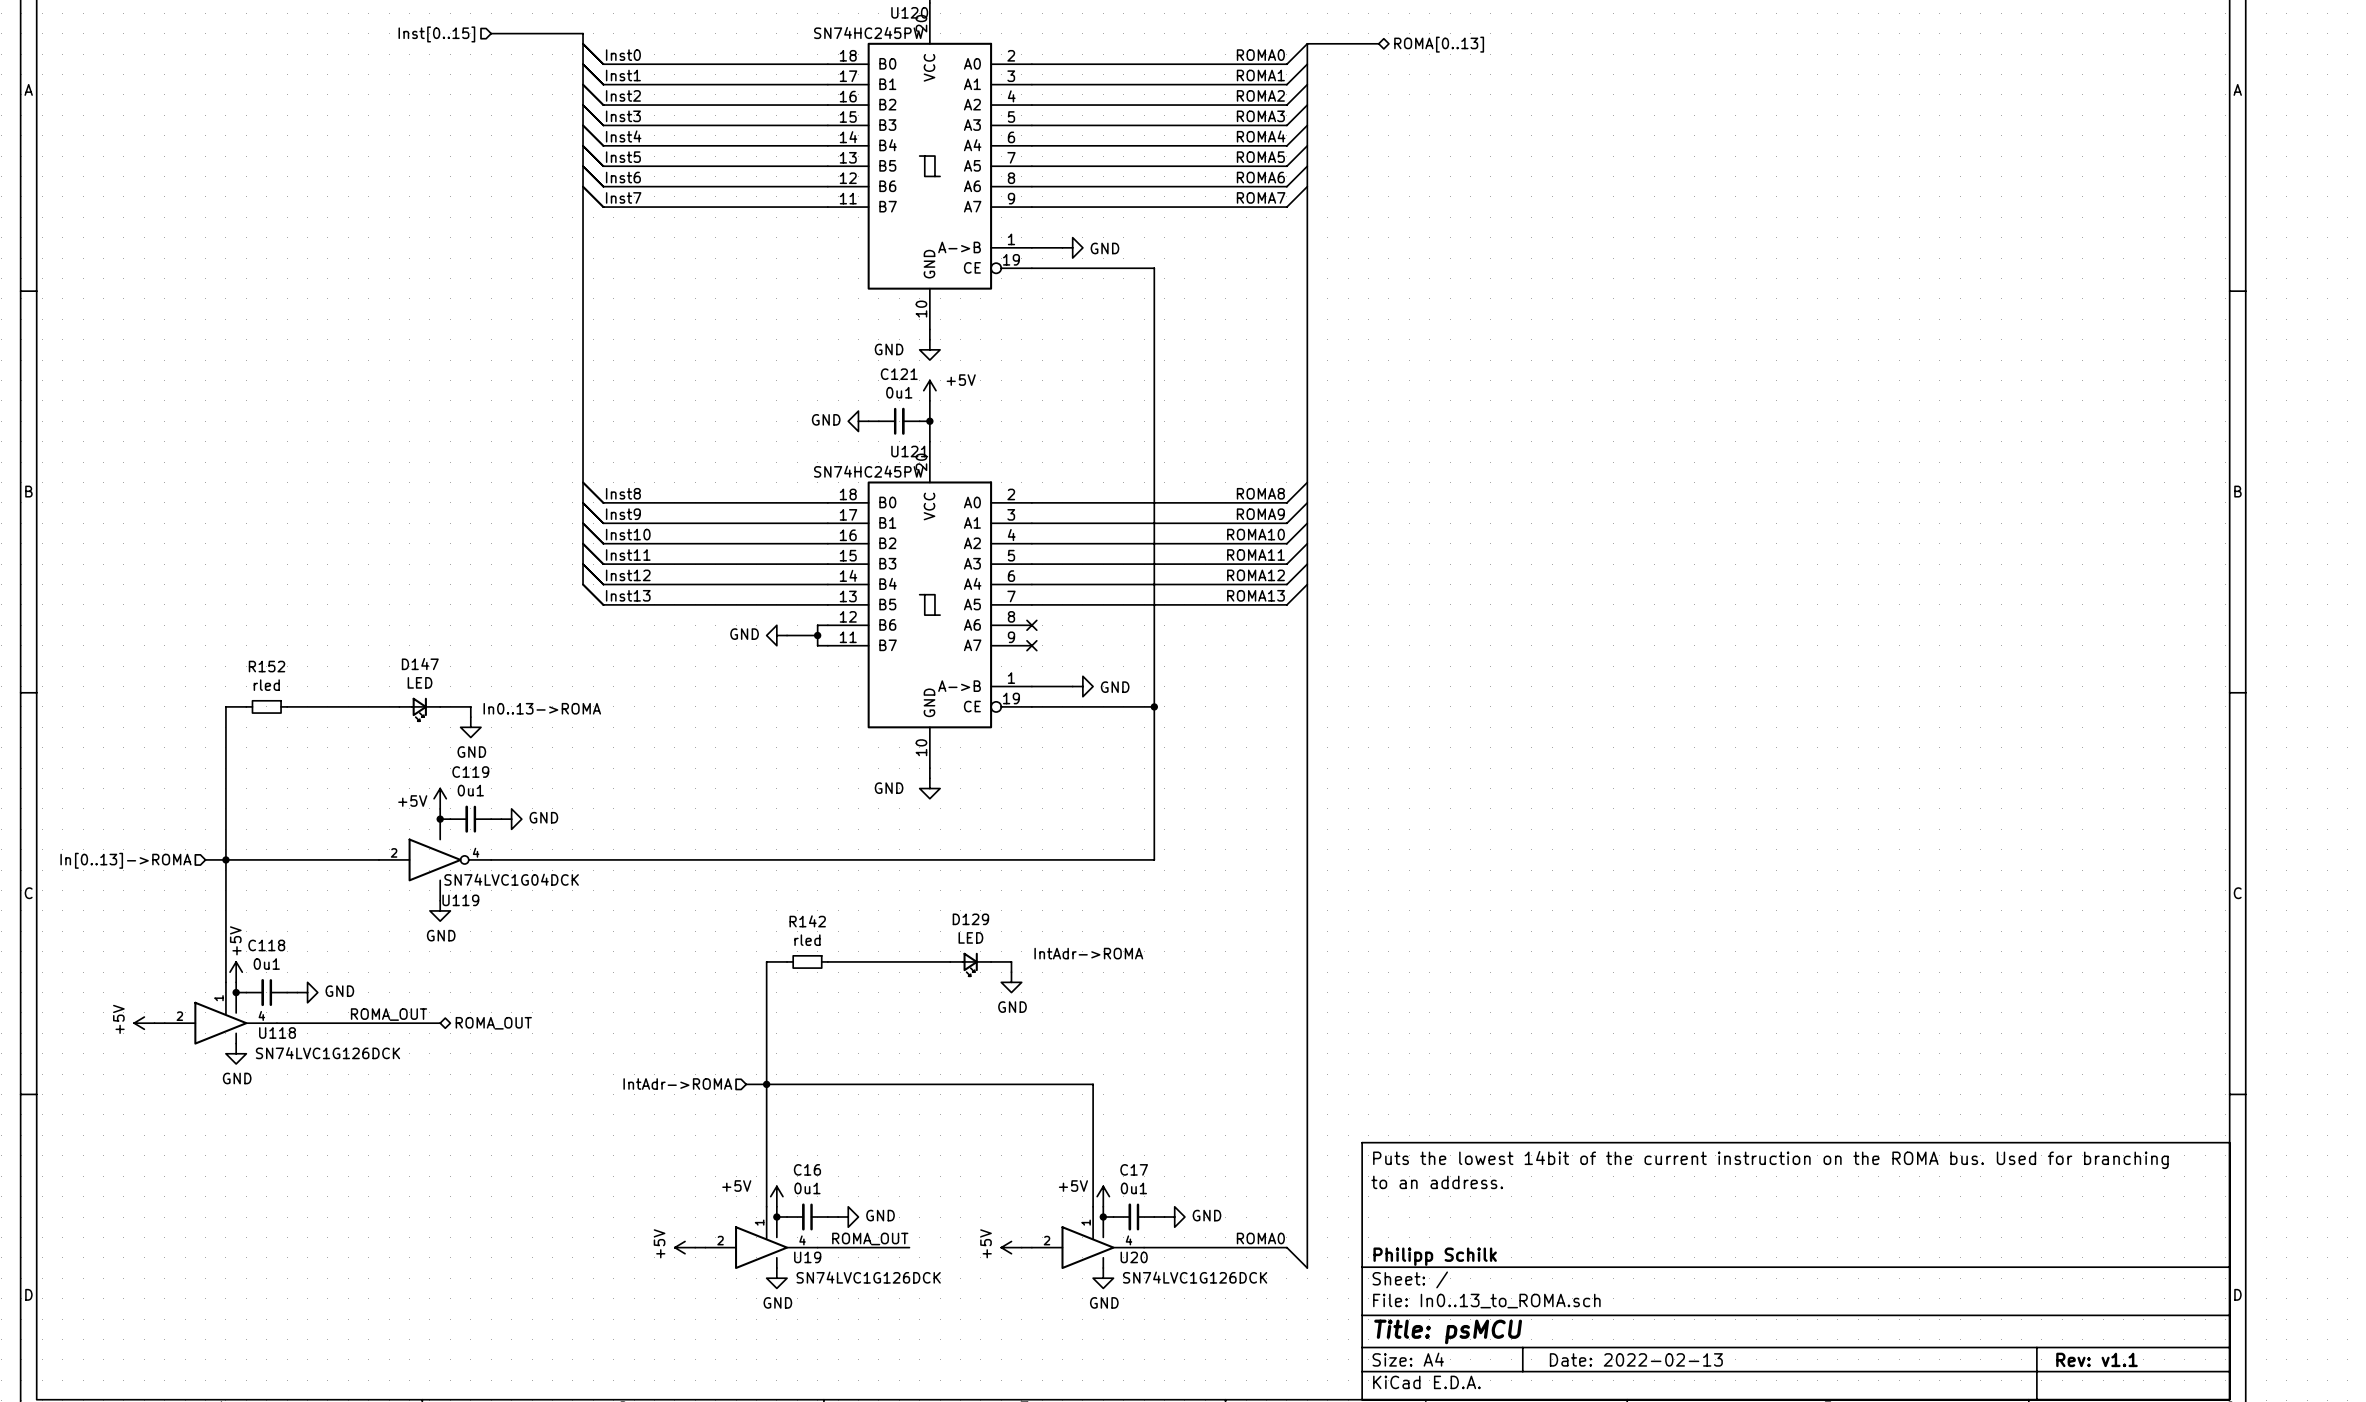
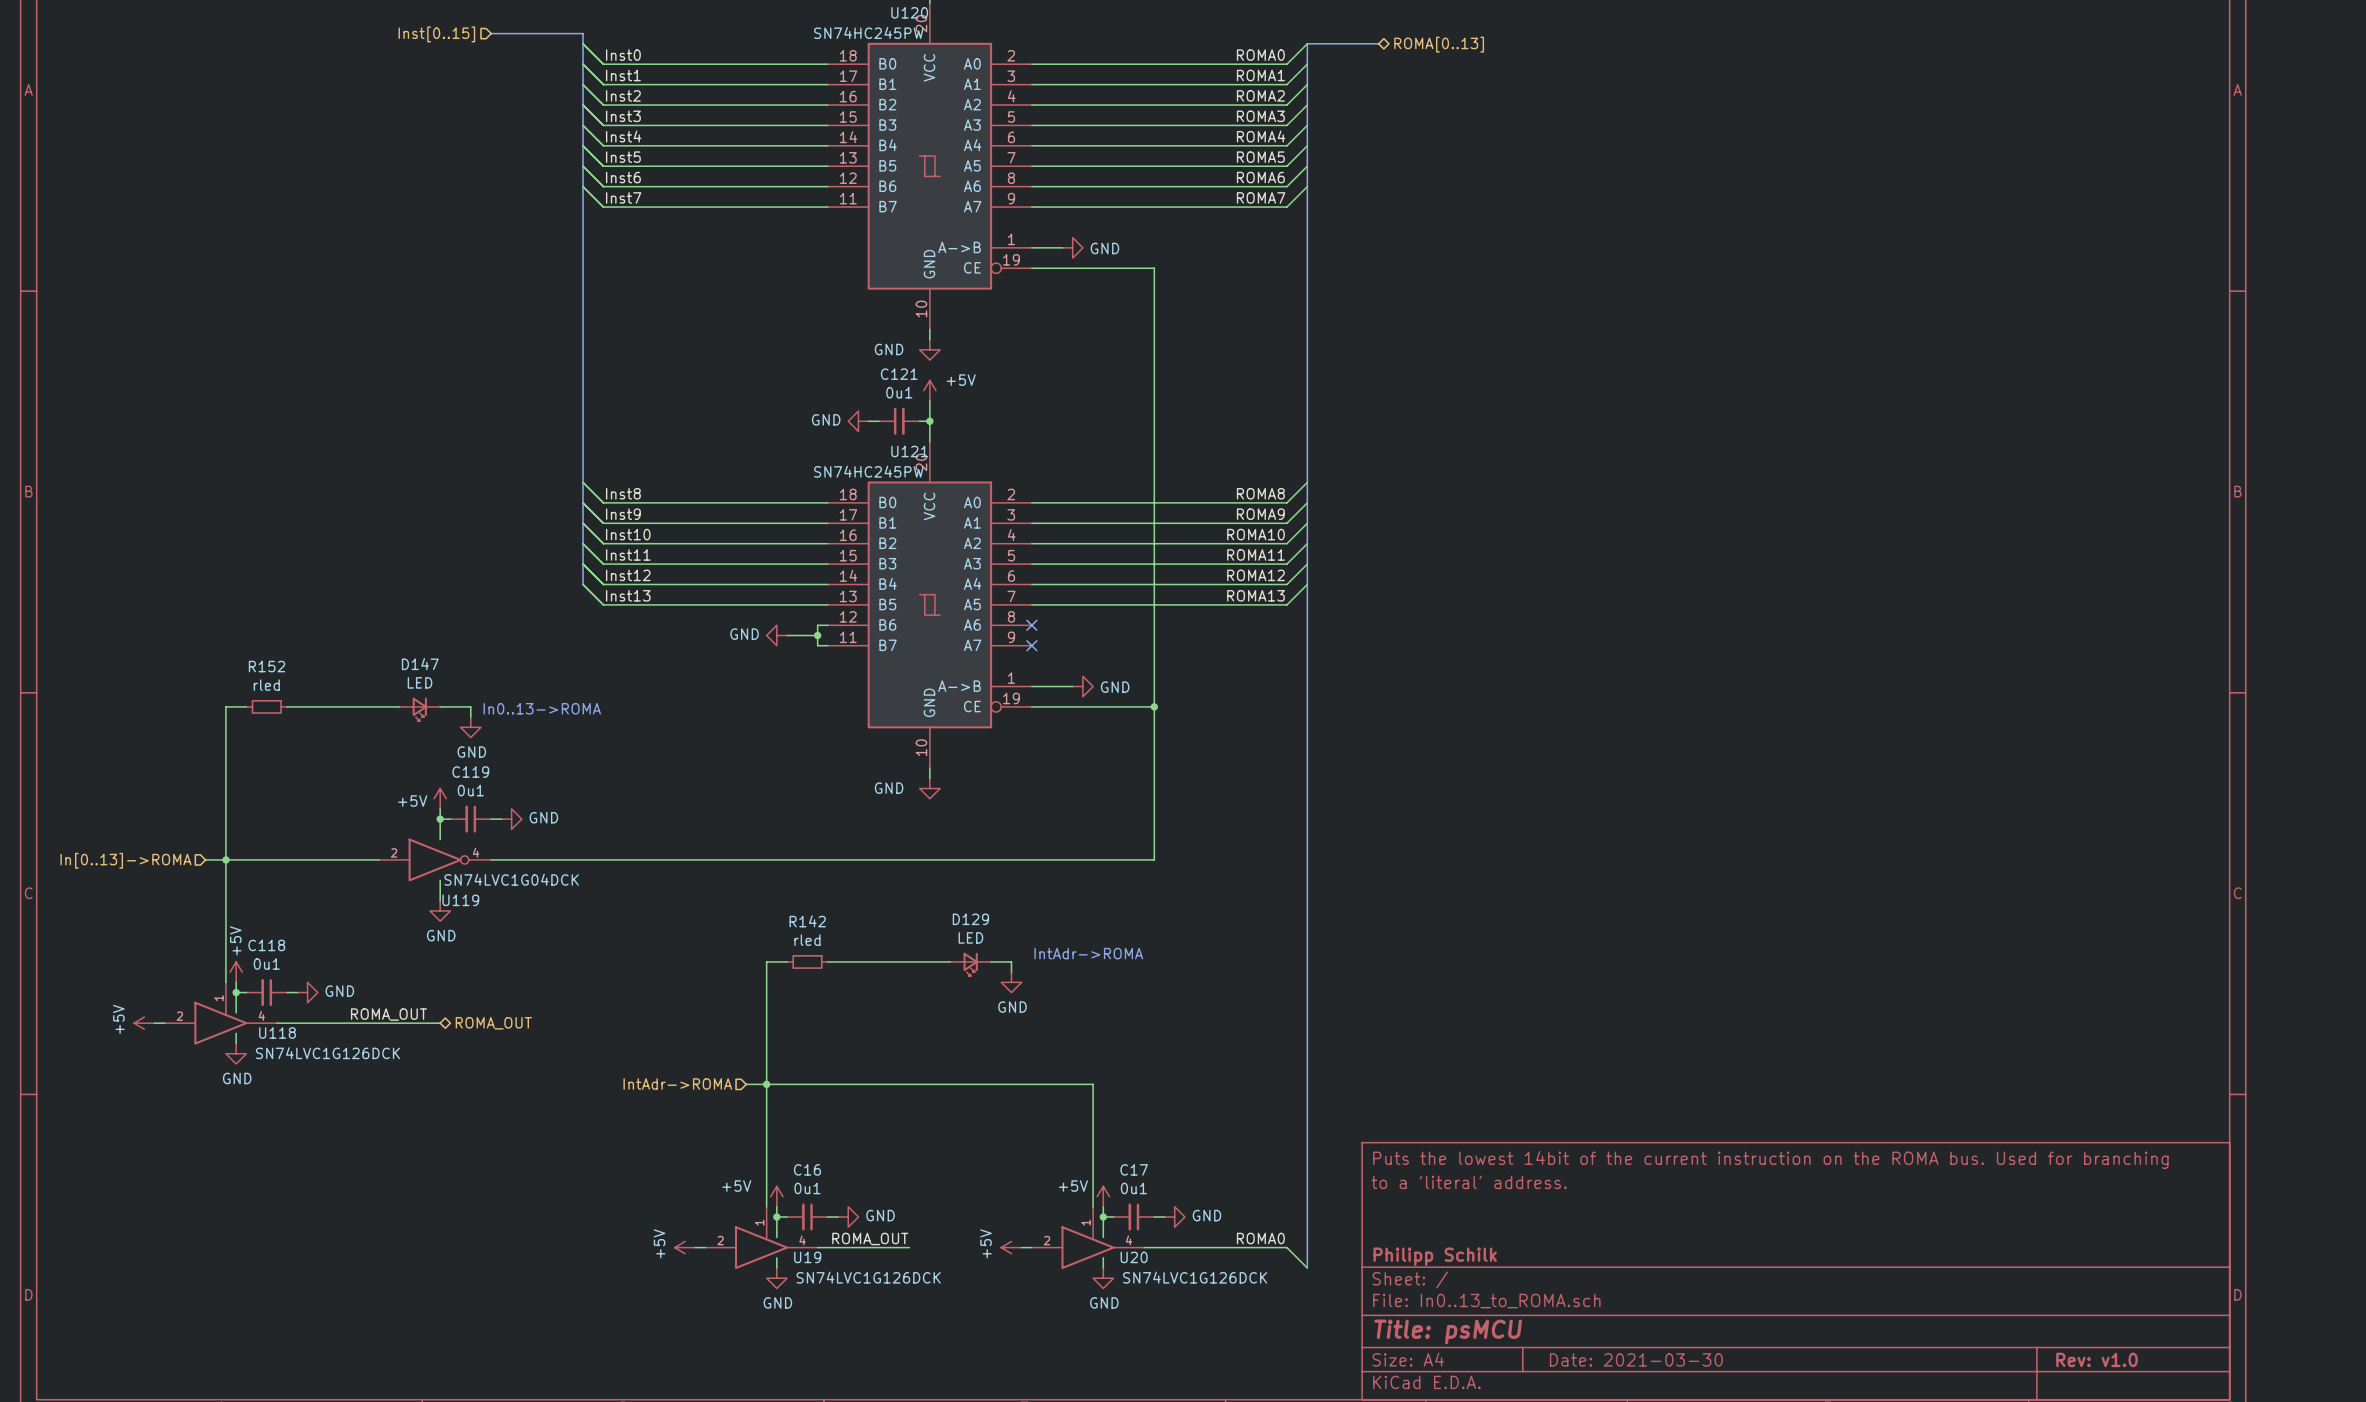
title block: to an address. (1437, 1182) -> to a 'literal' address. (1469, 1182)
title block: Date: 2022-02-13 (1636, 1359) -> Date: 2021-03-30 (1636, 1359)
title block: Rev: v1.1 (2097, 1359) -> Rev: v1.0 (2097, 1359)

